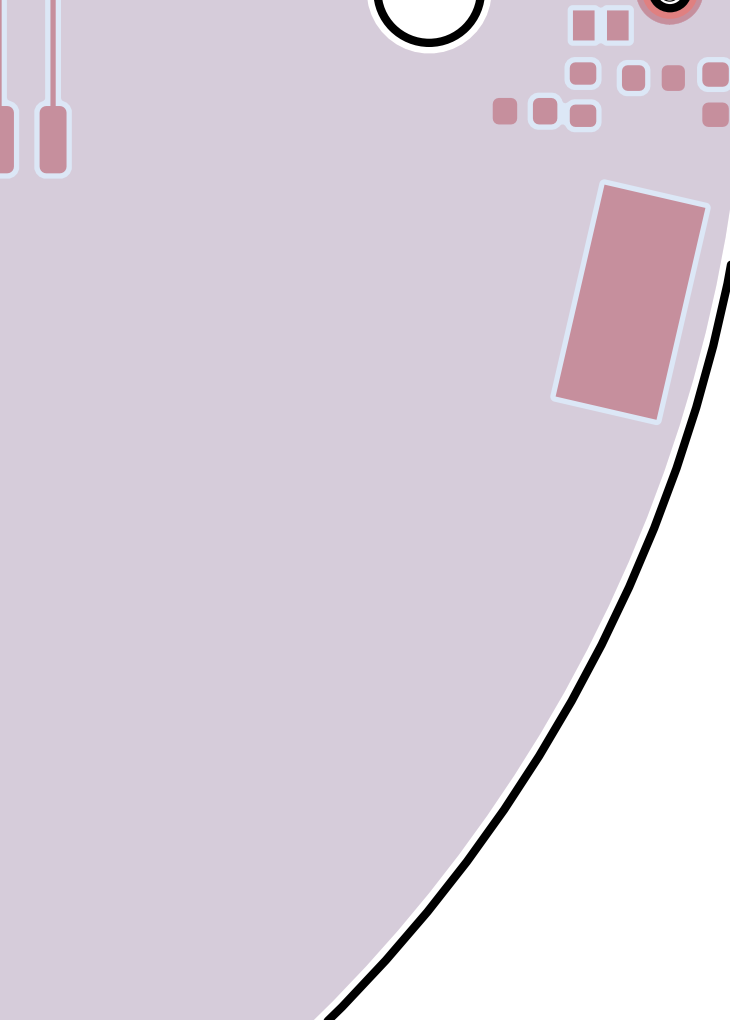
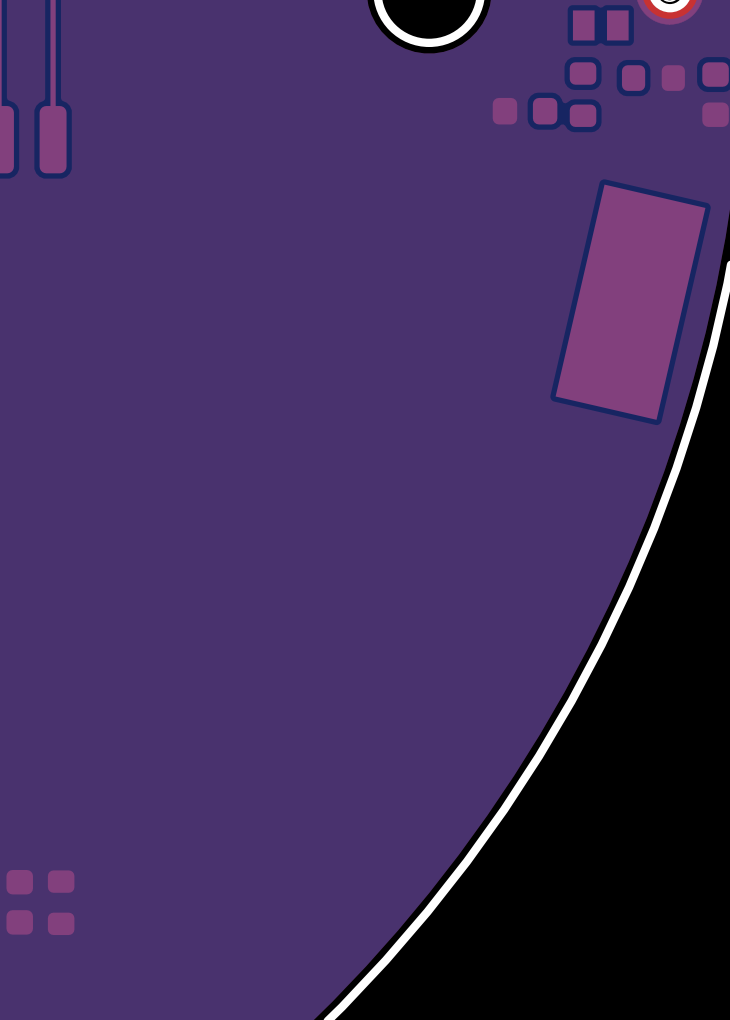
part: none -> (19, 902)
part: none -> (61, 902)

